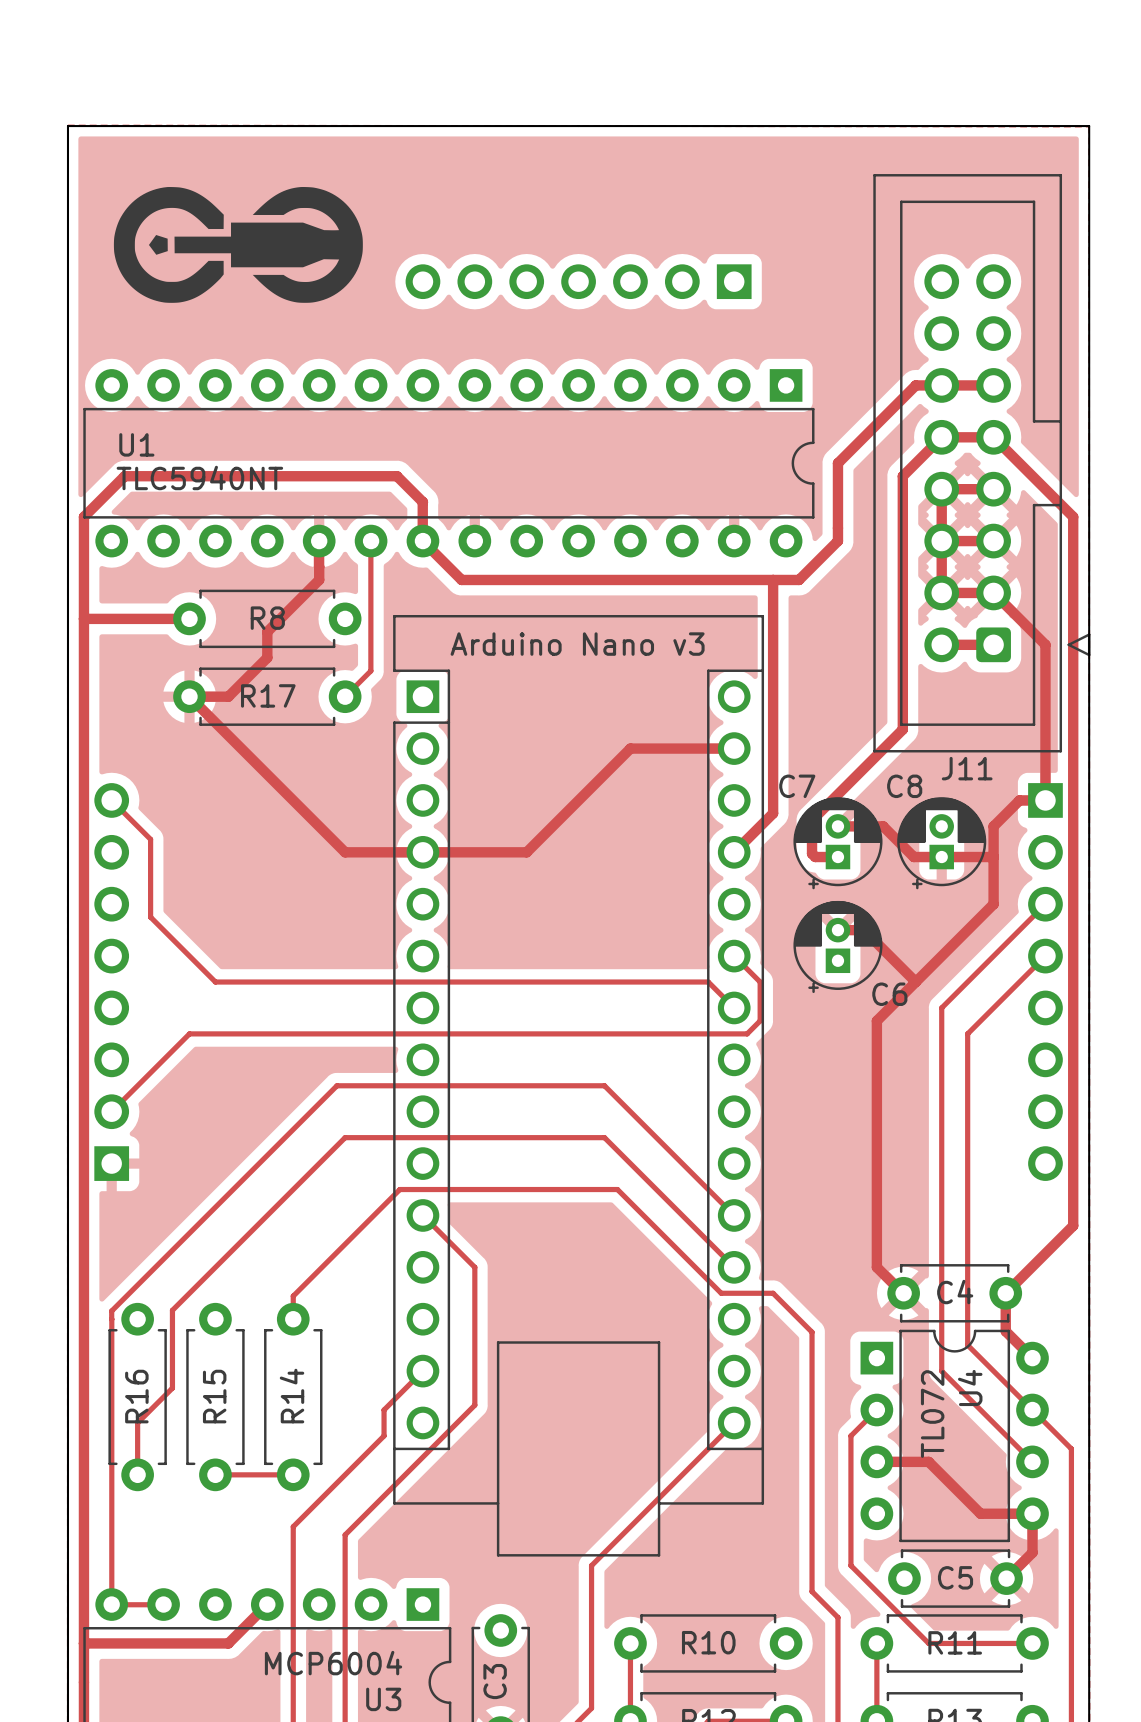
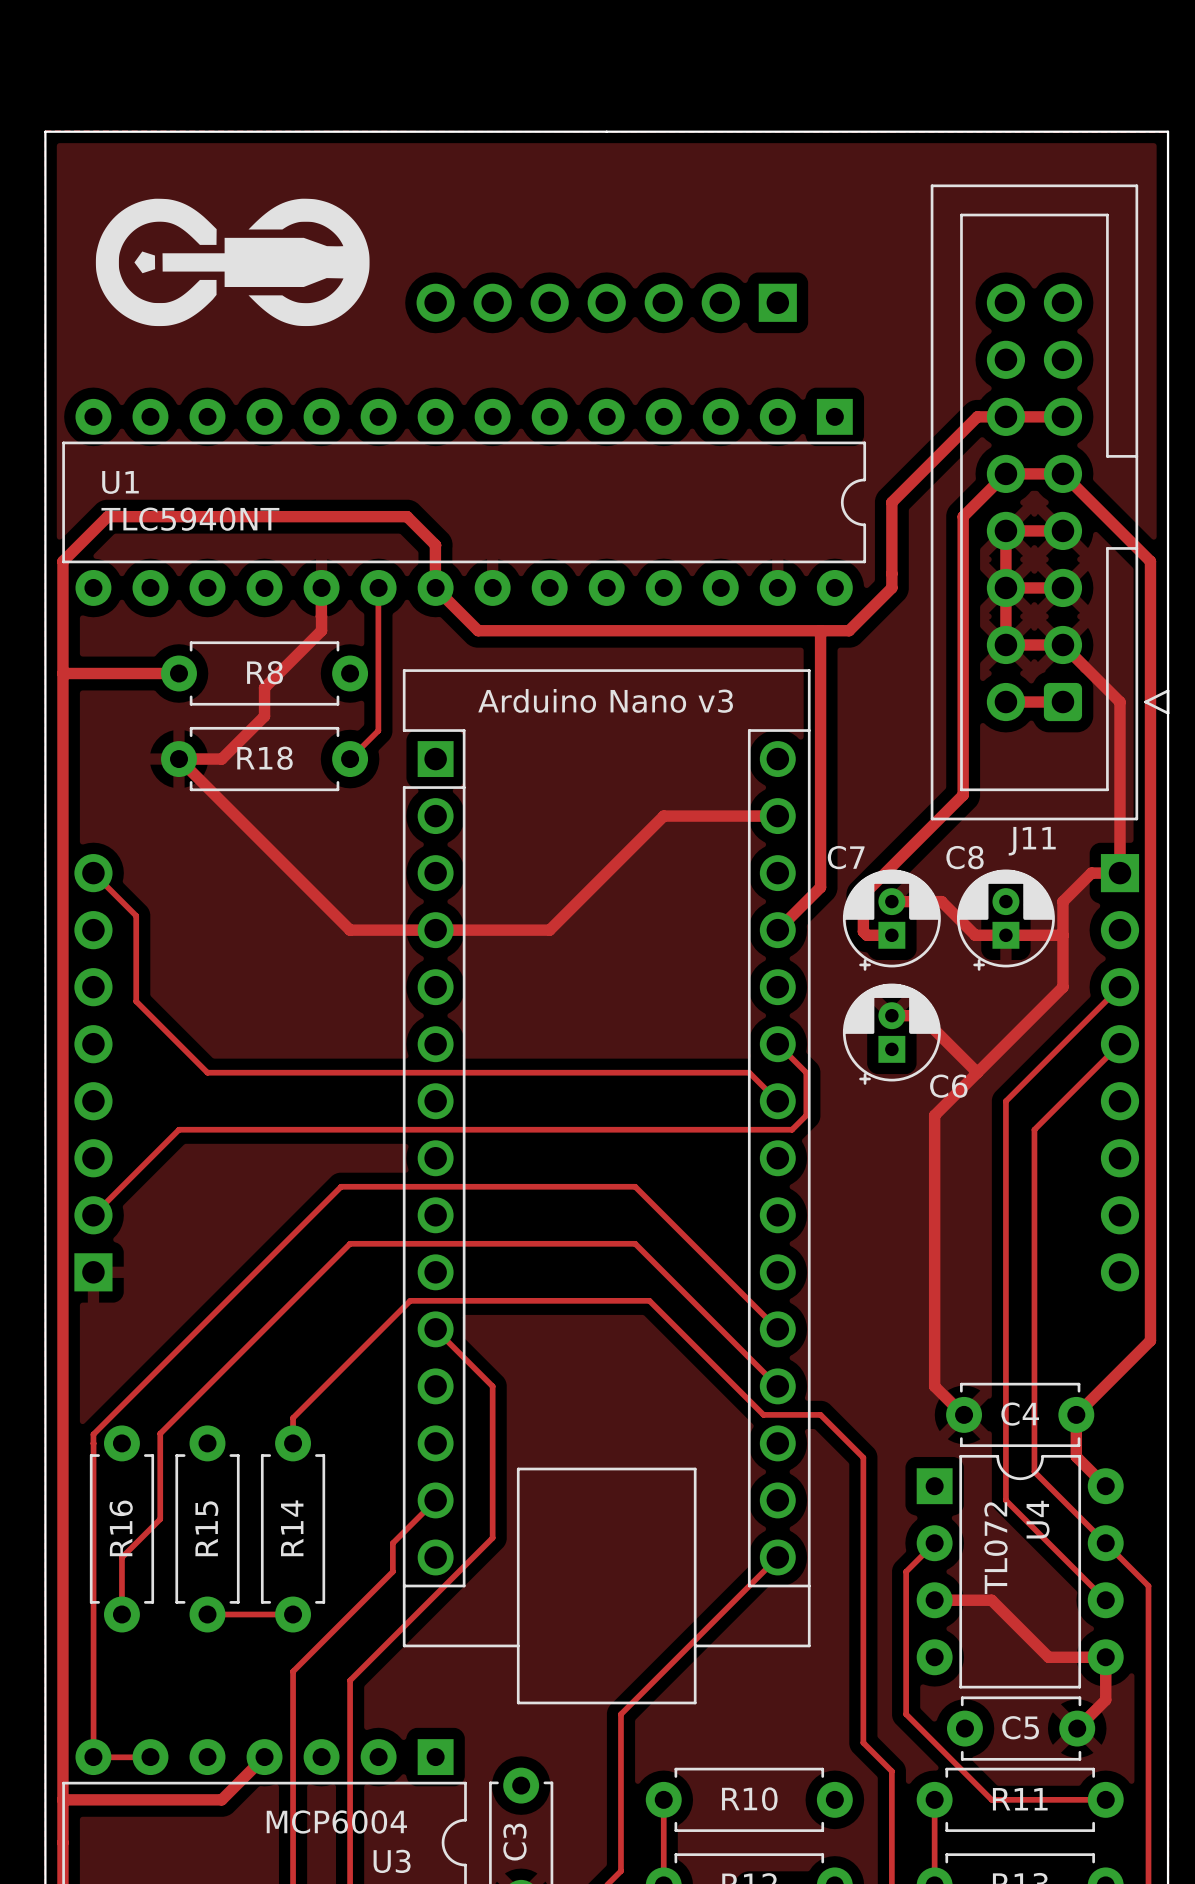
R17 name: R17 (268, 695) -> R18 (264, 758)

